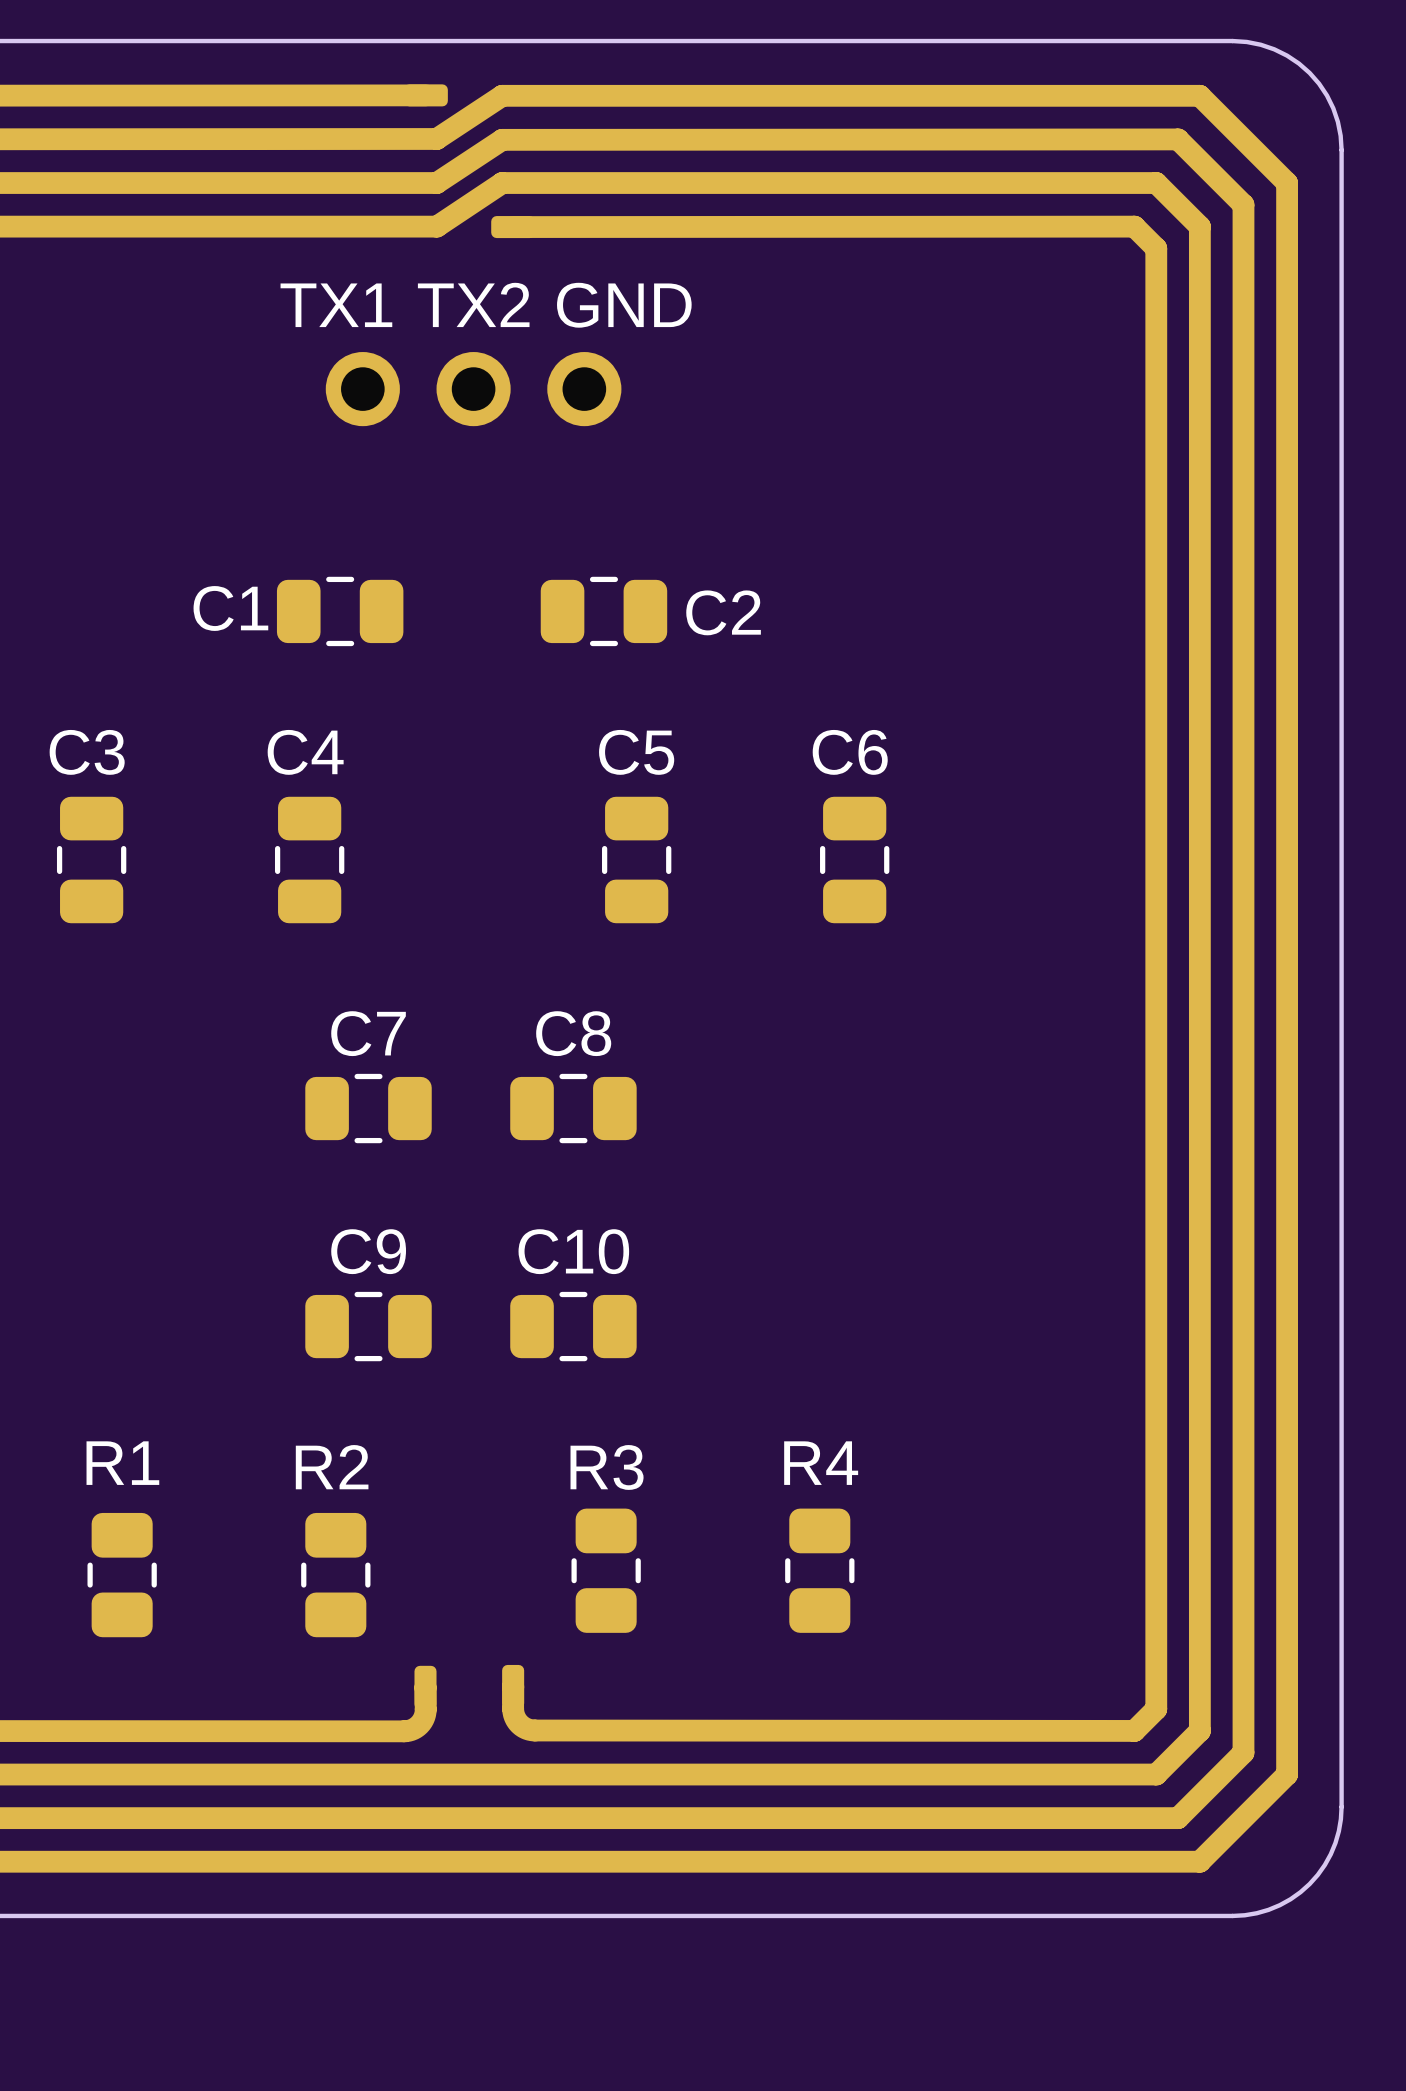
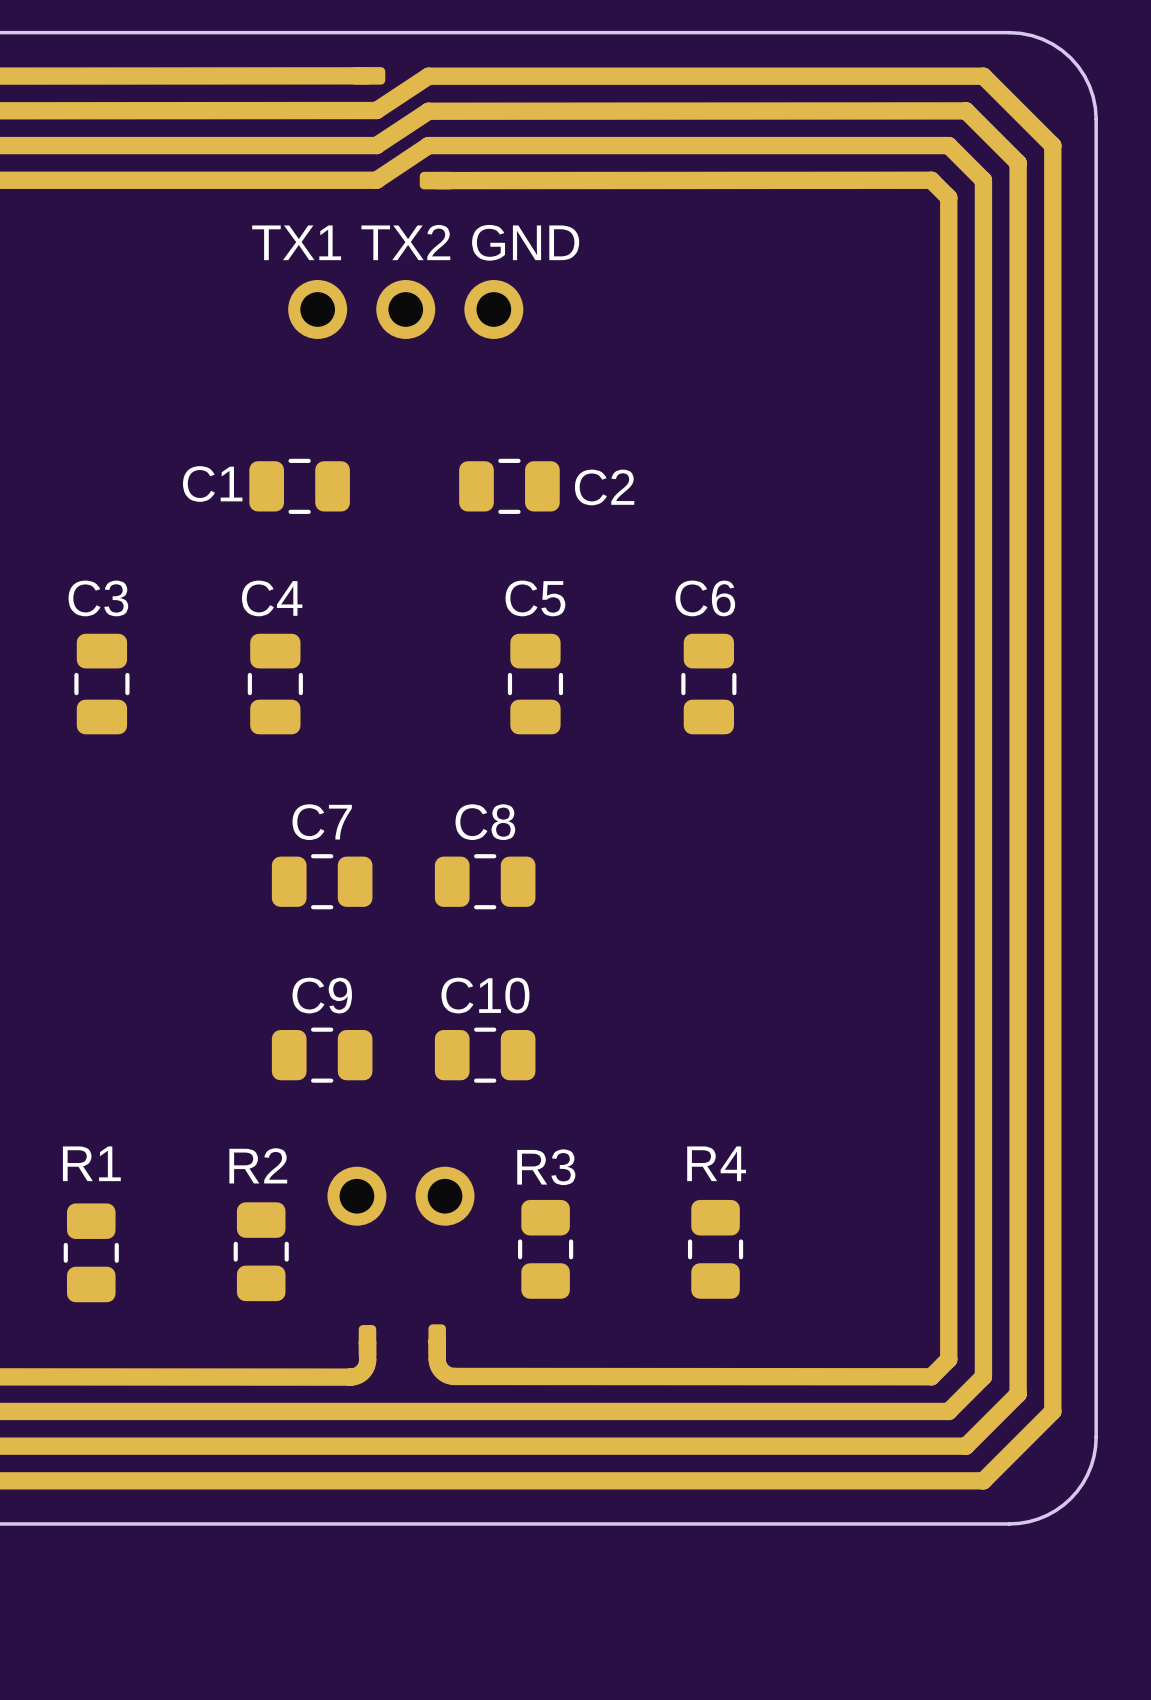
part: none -> (400, 1196)
R3 position: (606, 1570) -> (545, 1249)
R4 position: (819, 1570) -> (715, 1249)
R1 position: (122, 1575) -> (91, 1252)
R2 position: (335, 1575) -> (261, 1251)

